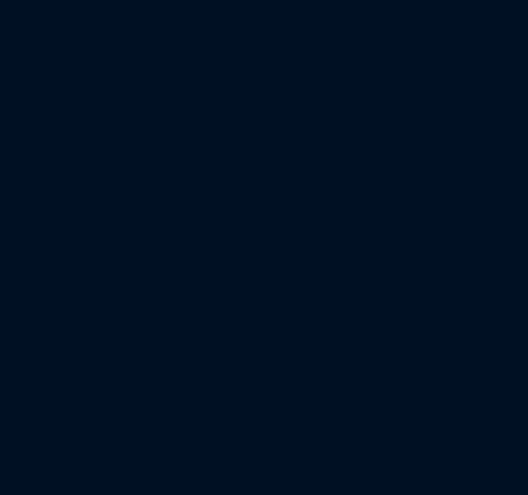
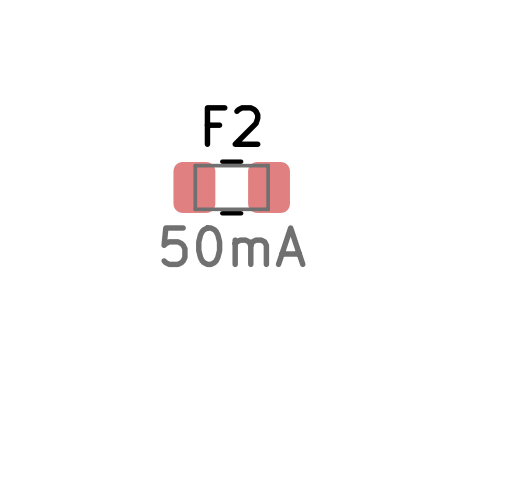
F2: none -> 50mA (231, 187)

